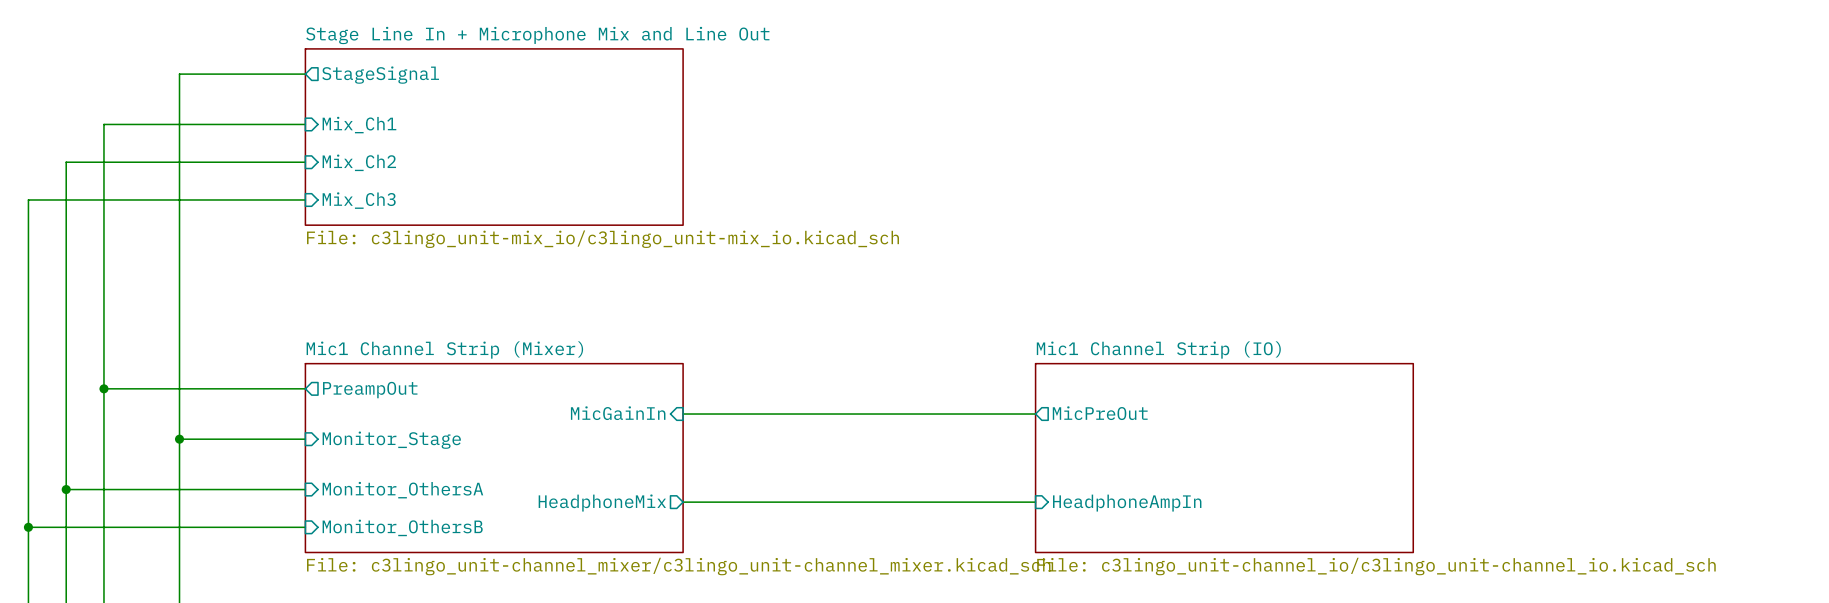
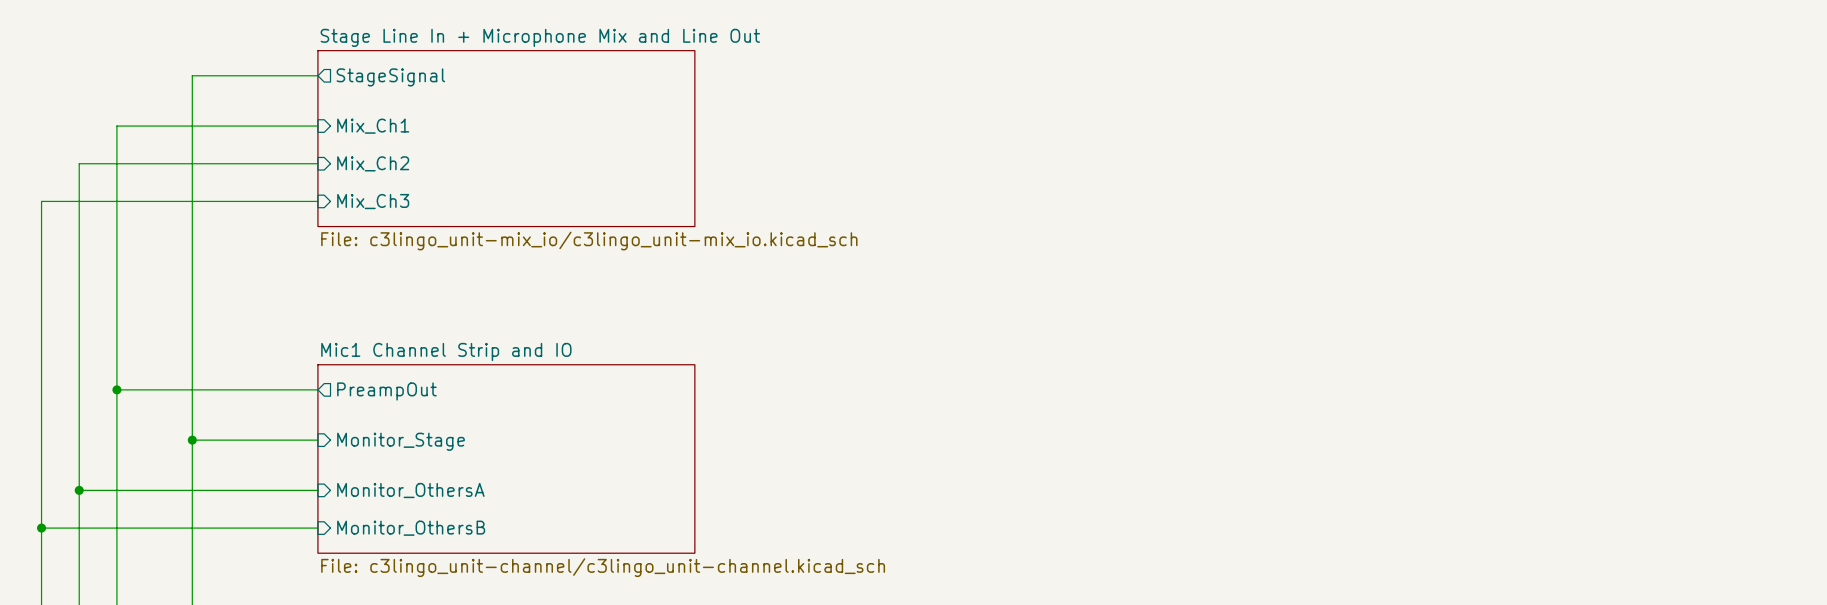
sheet Mic1 Channel Strip (Mixer) name: Mic1 Channel Strip (Mixer) (444, 350) -> Mic1 Channel Strip and IO (446, 351)
sheet pin: MicGainIn (618, 413) -> none
sheet pin: MicPreOut (1100, 413) -> none
wire: (683, 414) (1035, 414) -> none
sheet Mic1 Channel Strip (IO): File: c3lingo_unit-channel_io/c3lingo_unit-channel_io.kicad_sch (1224, 458) -> none
wire: (683, 502) (1035, 502) -> none
sheet pin: HeadphoneMix (602, 503) -> none
sheet pin: HeadphoneAmpIn (1127, 503) -> none
sheet Mic1 Channel Strip (Mixer) value: File: c3lingo_unit-channel_mixer/c3lingo_unit-channel_mixer.kicad_sch (678, 566) -> File: c3lingo_unit-channel/c3lingo_unit-channel.kicad_sch (603, 567)

